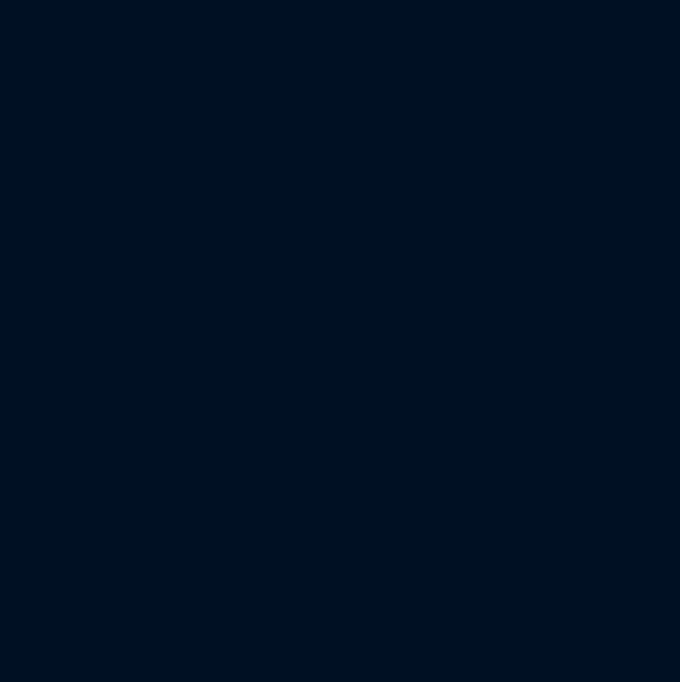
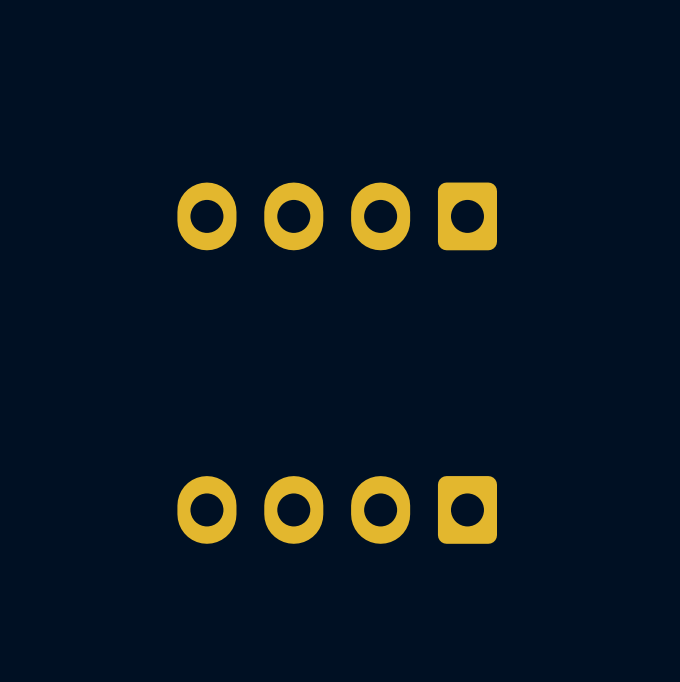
part: none -> (337, 216)
part: none -> (337, 509)

